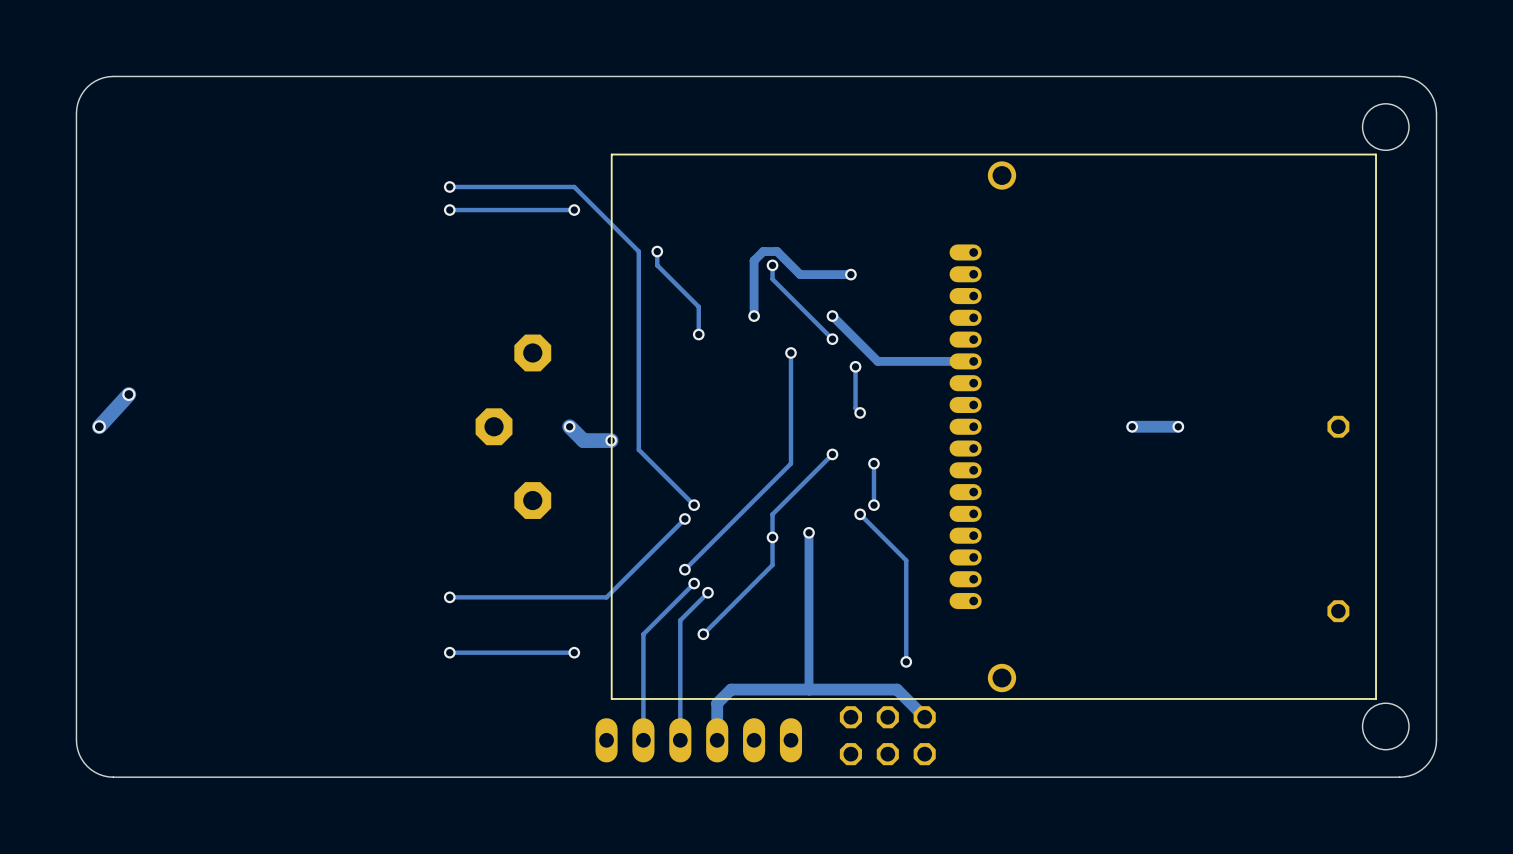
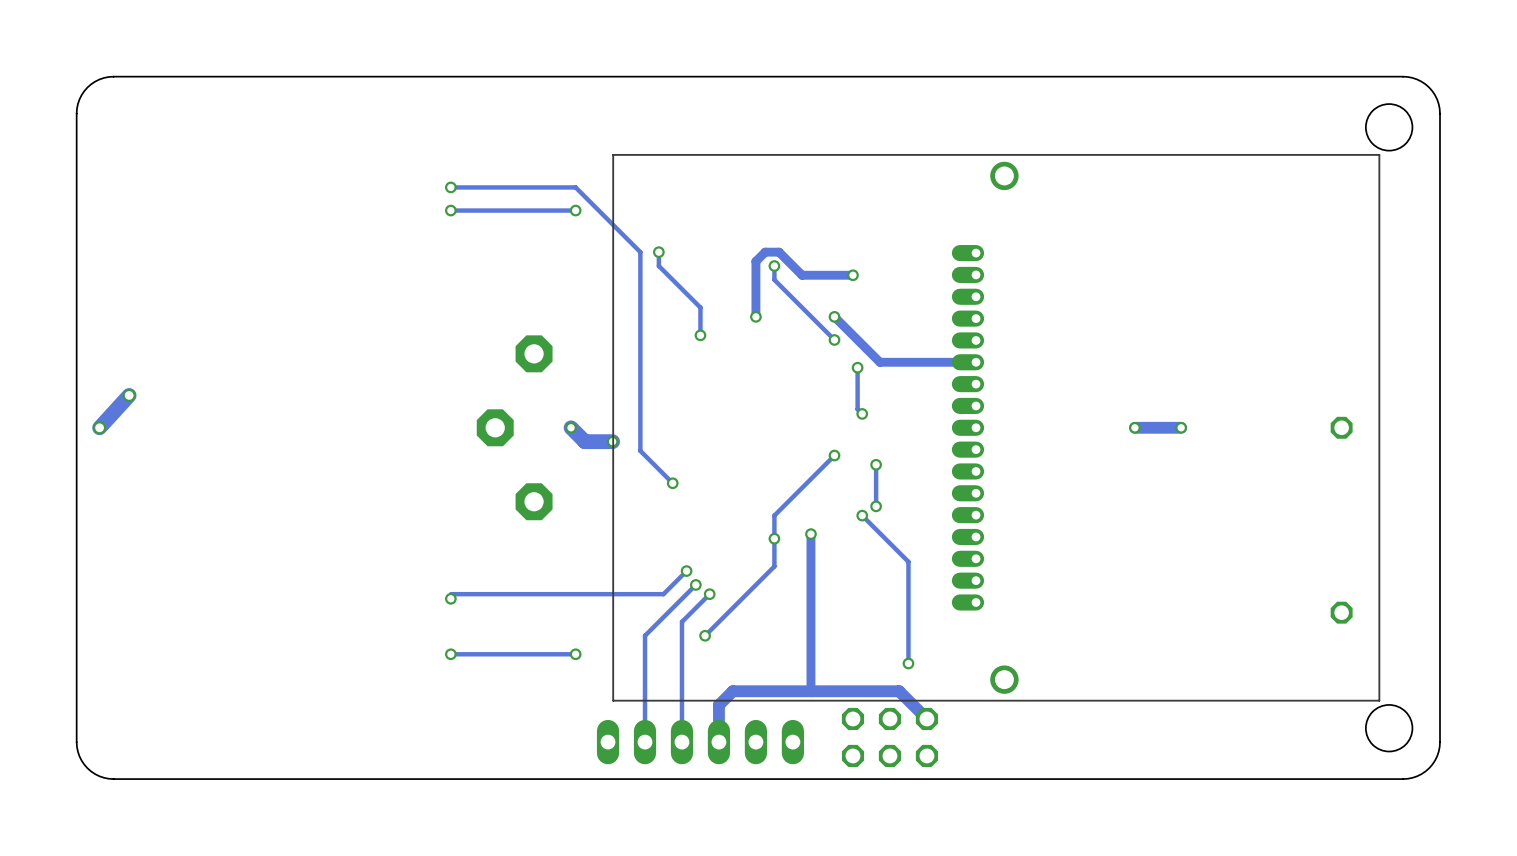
track: (790, 352) (790, 463) (684, 569) -> (450, 594) (663, 594) (686, 571)
via: (790, 352) -> none
track: (671, 482) (694, 505) -> none
via: none -> (672, 483)
via: (694, 505) -> none
track: (684, 518) (606, 597) (449, 597) -> none
via: (684, 518) -> none

